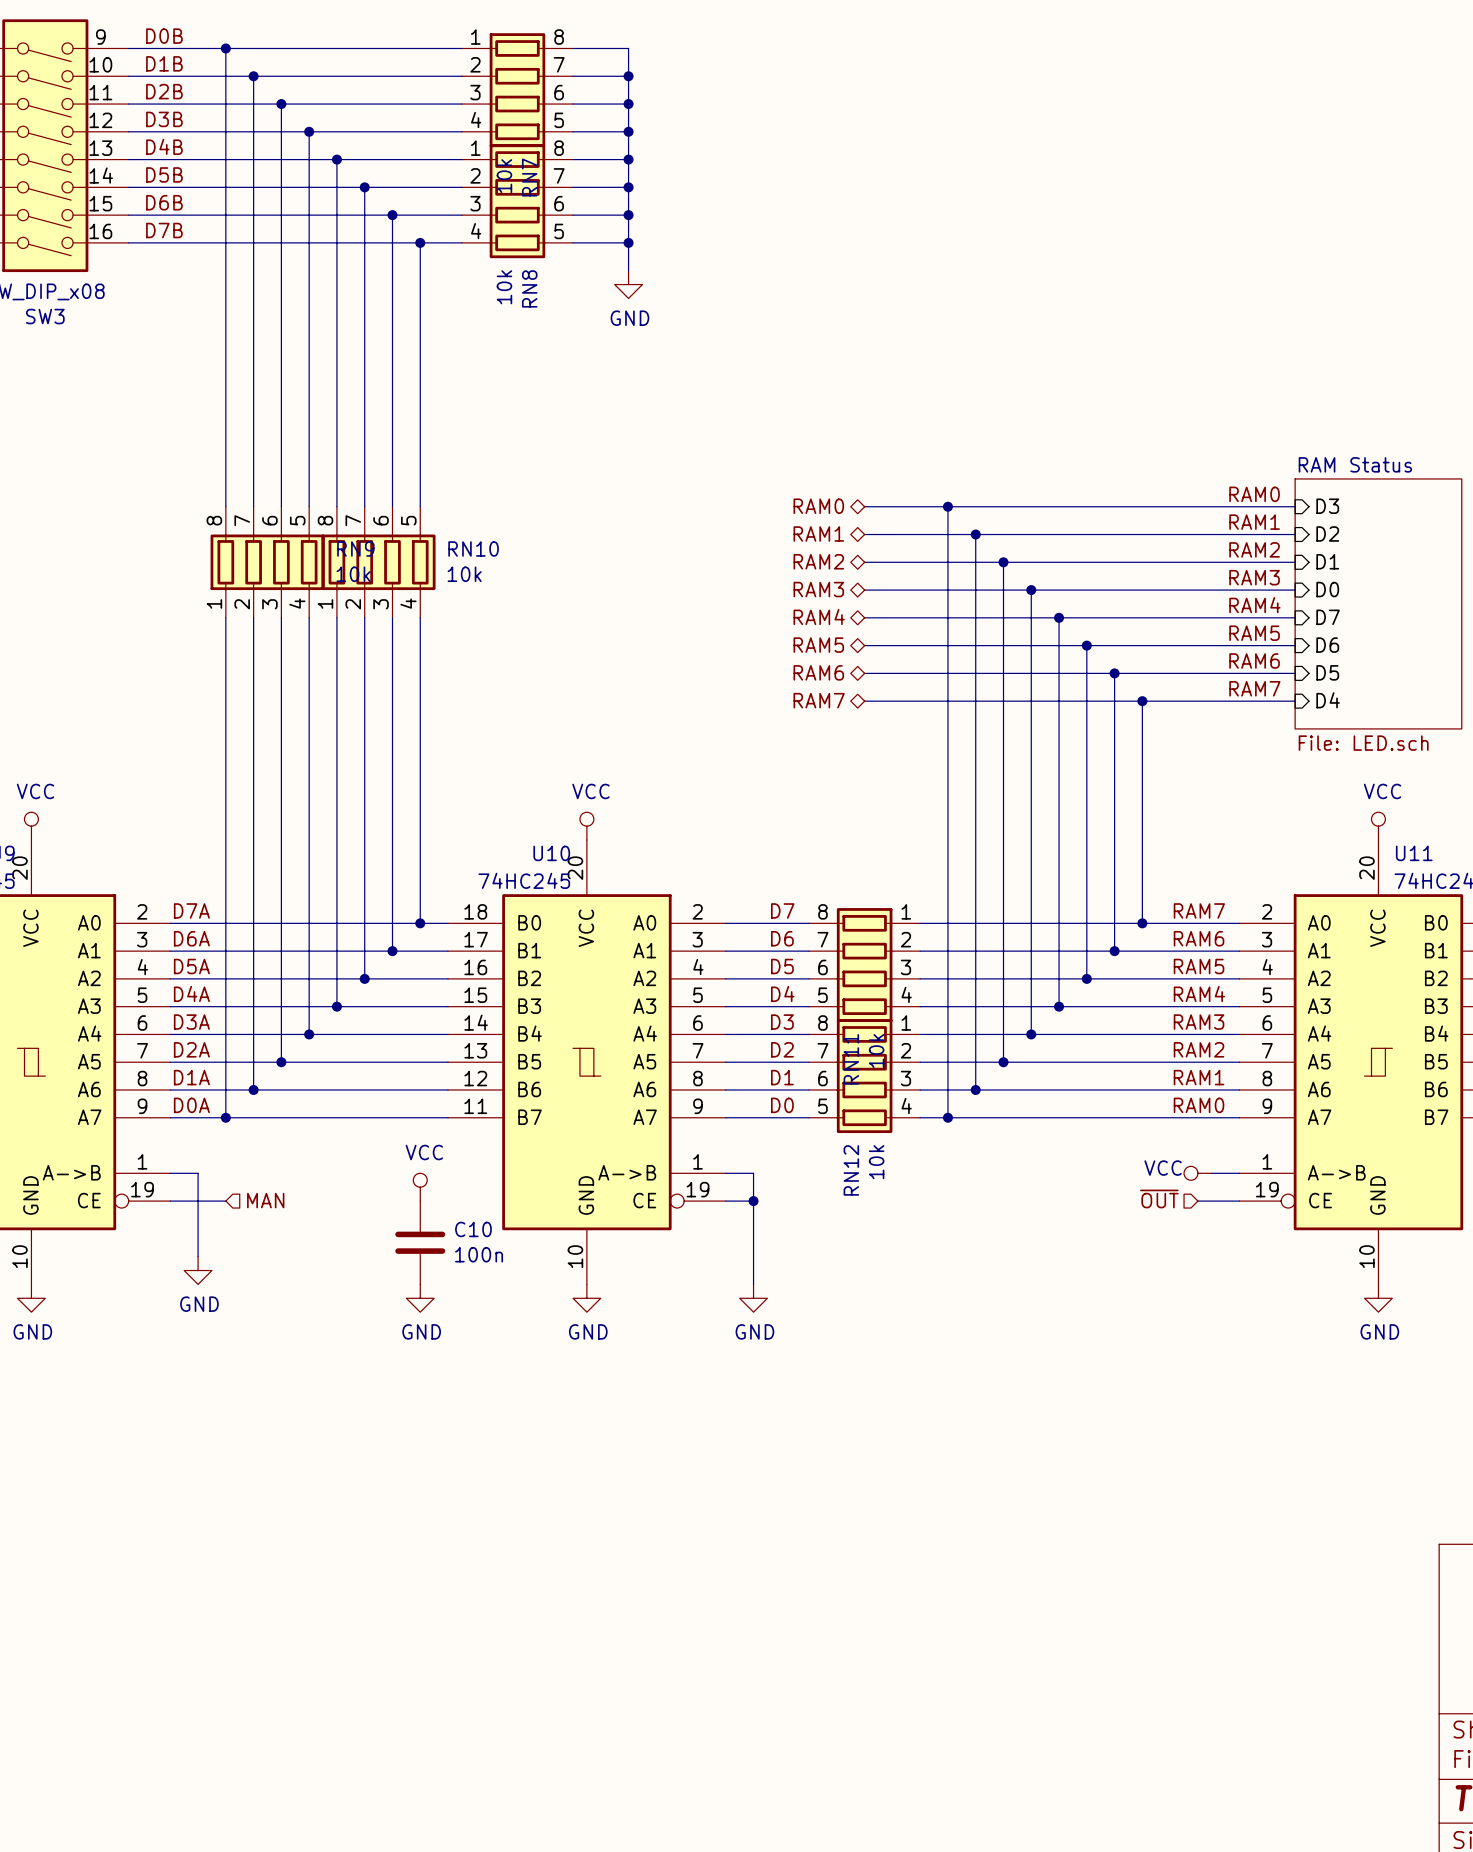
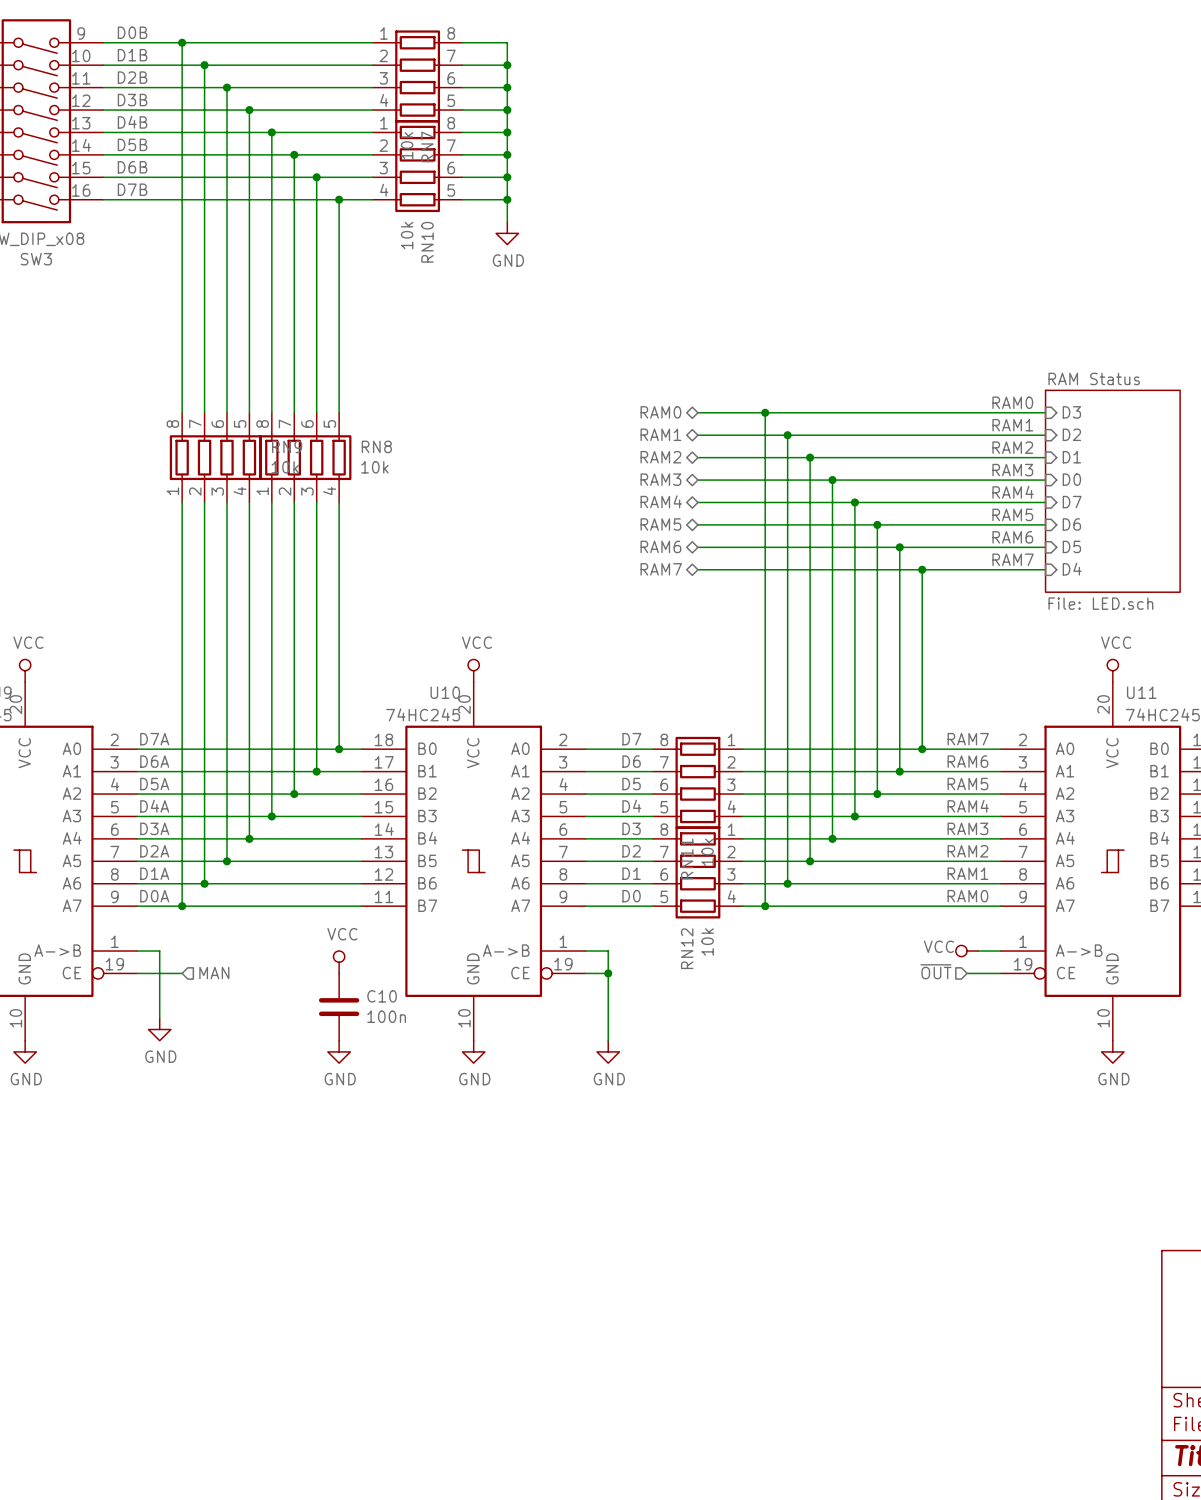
RN8 name: RN8 (529, 288) -> RN10 (427, 242)
RN10 name: RN10 (473, 549) -> RN8 (376, 446)

